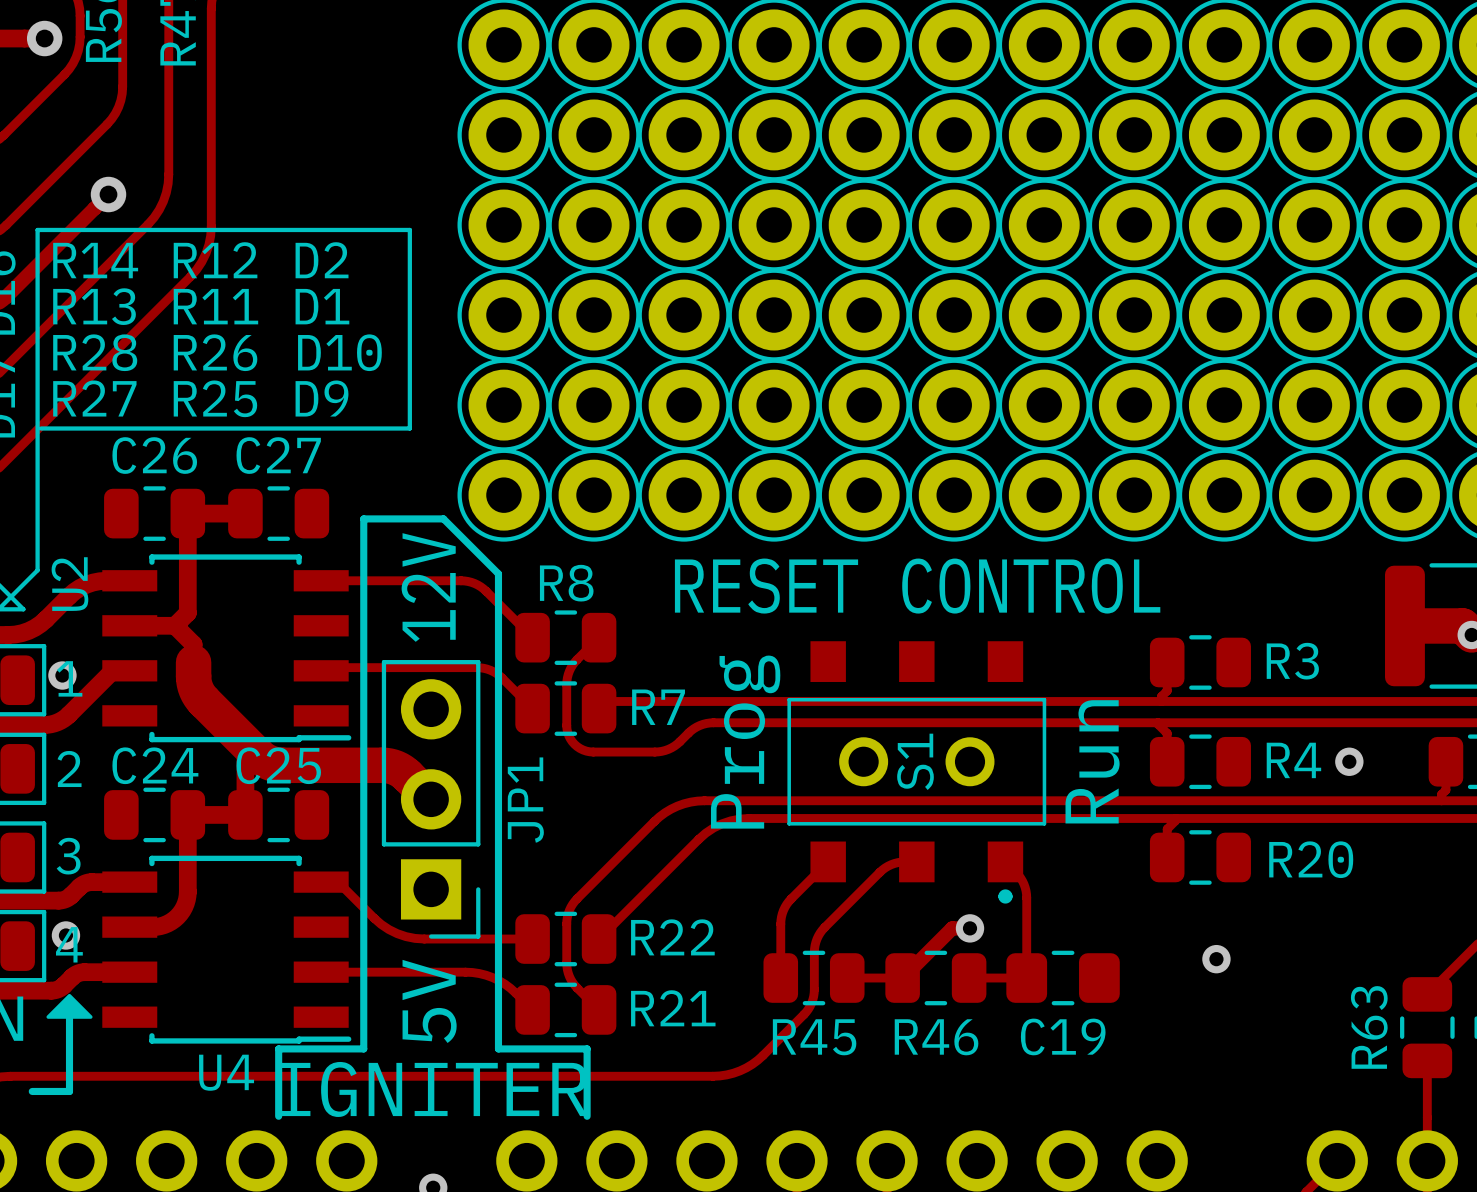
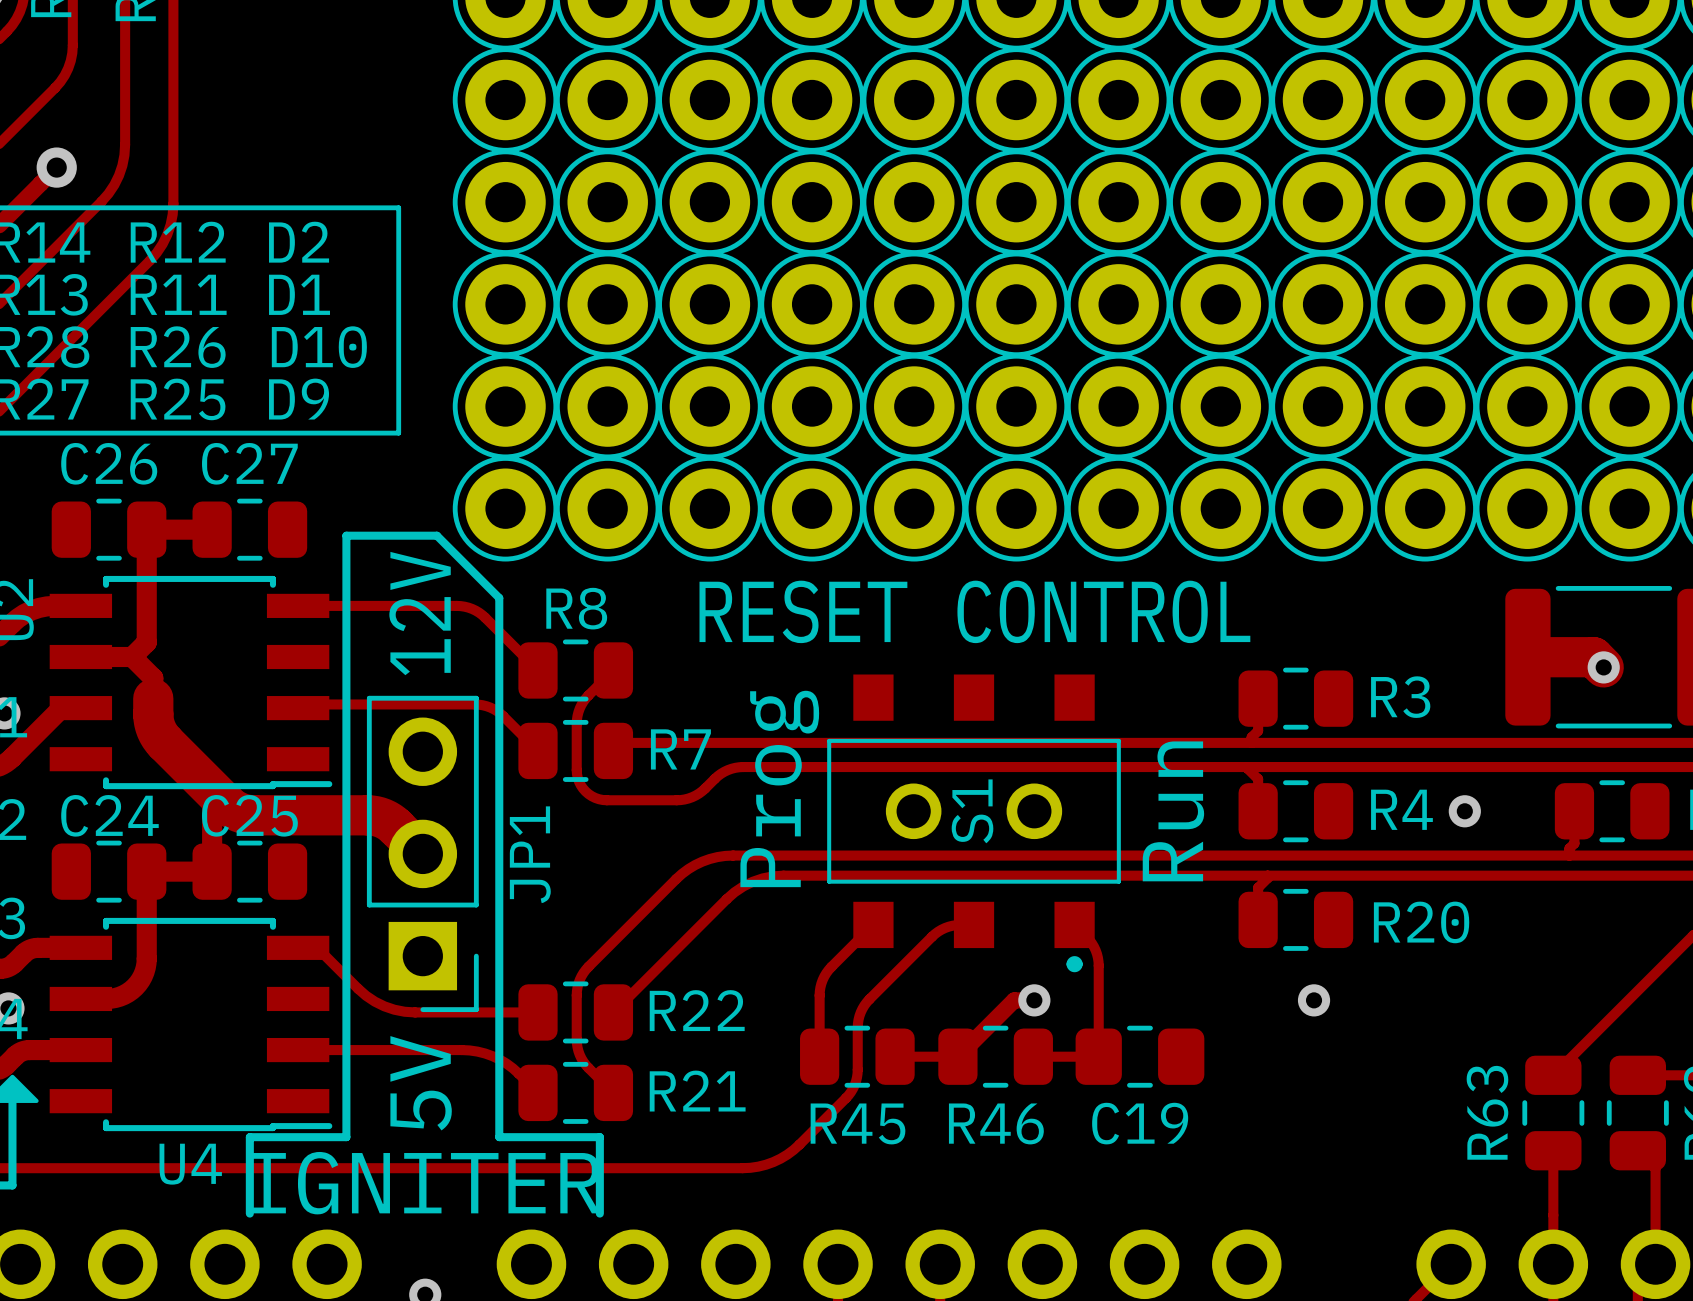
via position: (1216, 959) -> (1314, 1000)

